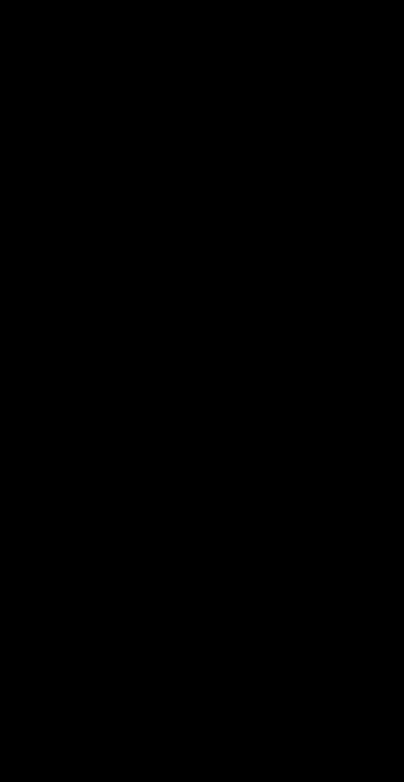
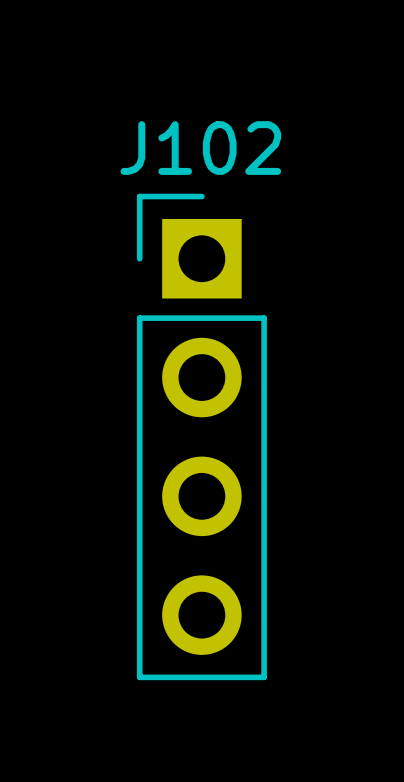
J102: none -> (201, 436)

